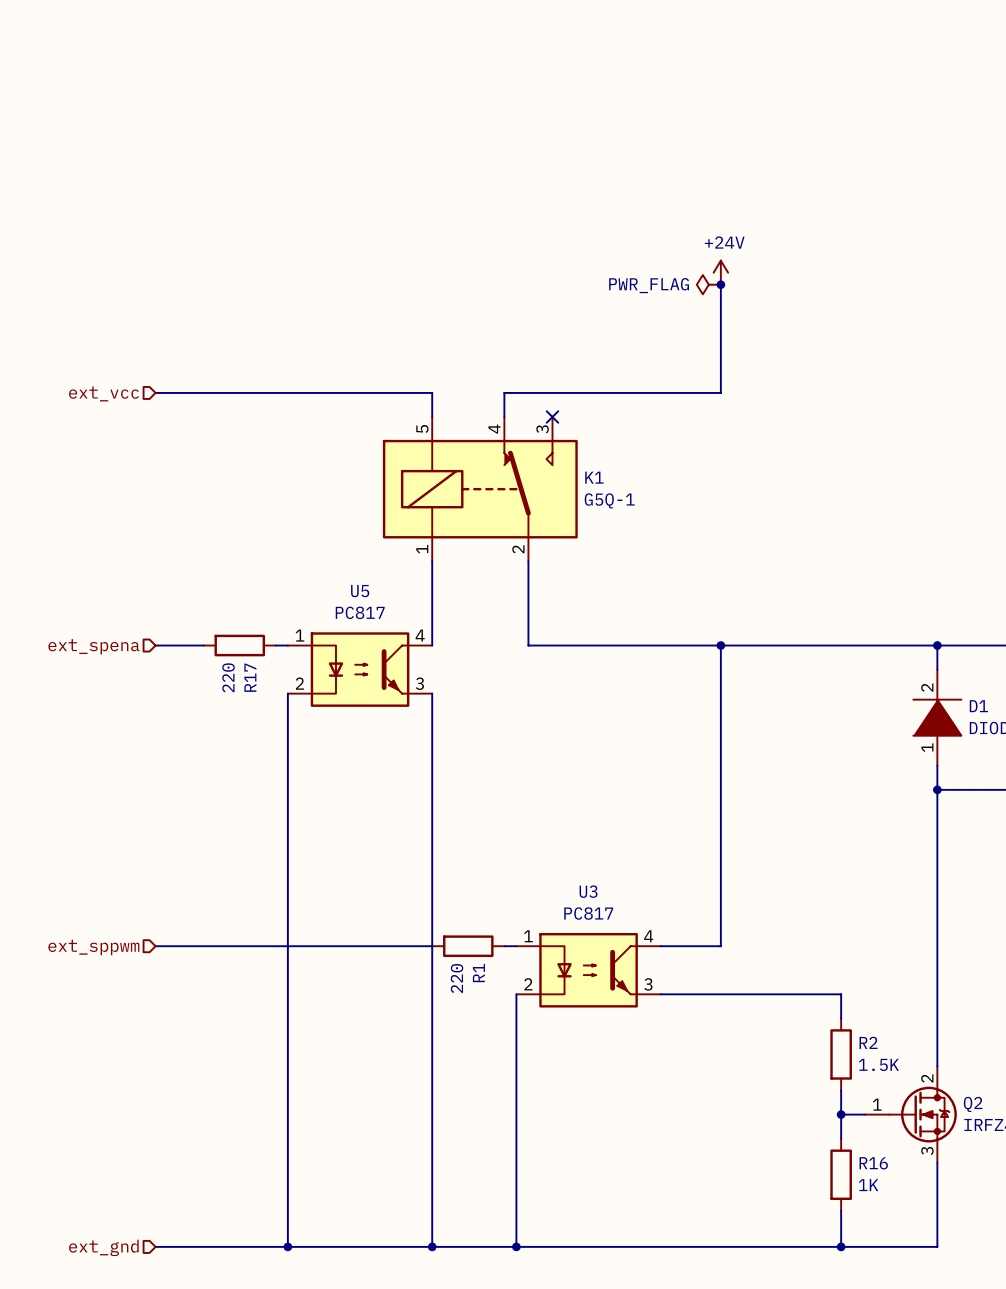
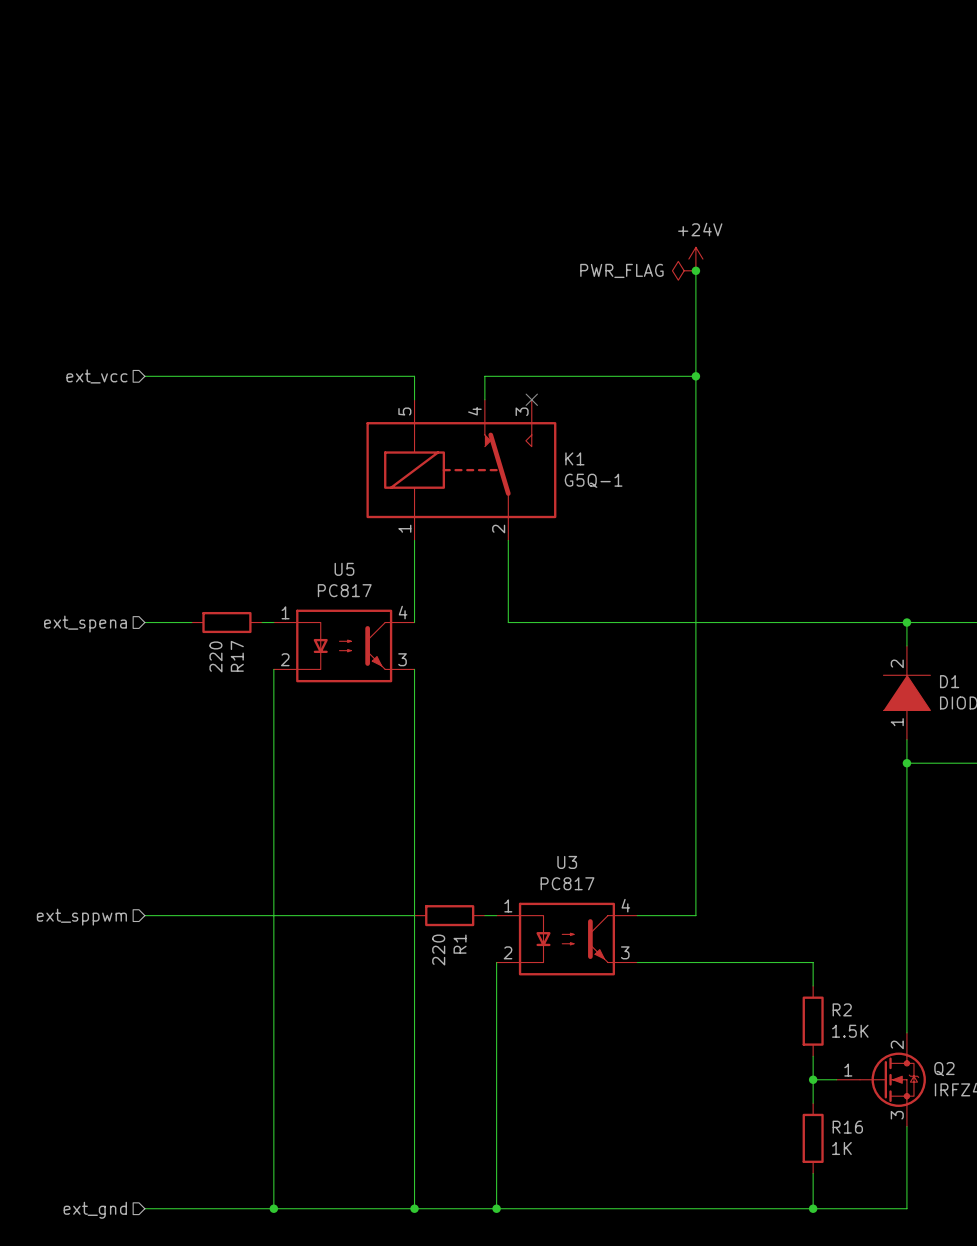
wire: none -> (695, 376) (695, 622)
junction: none -> (695, 376)
junction: (720, 645) -> none

